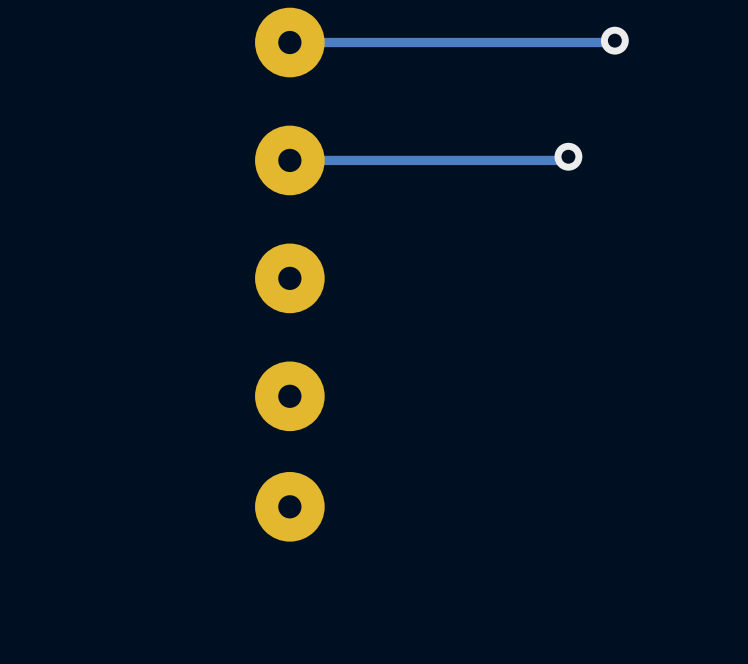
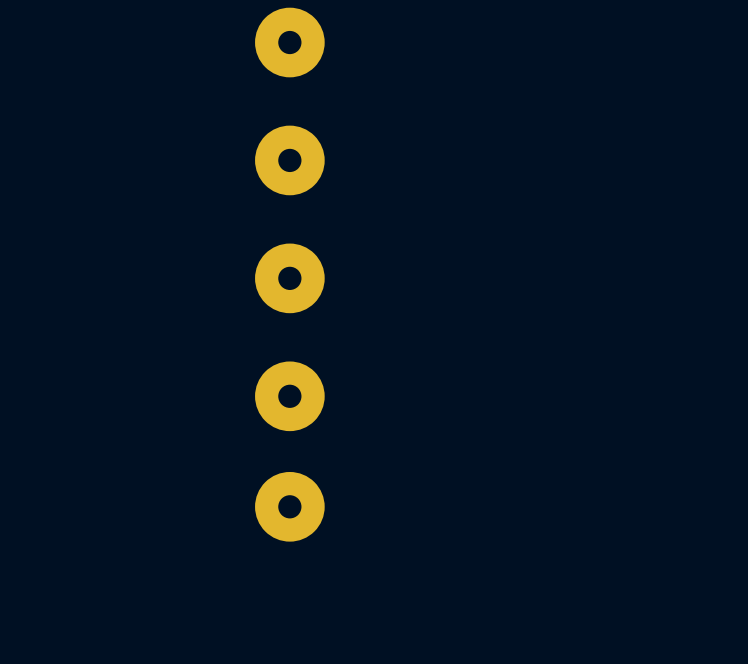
track: (614, 40) (613, 42) (289, 42) -> none
via: (614, 40) -> none
track: (568, 156) (564, 160) (289, 160) -> none
via: (568, 156) -> none

